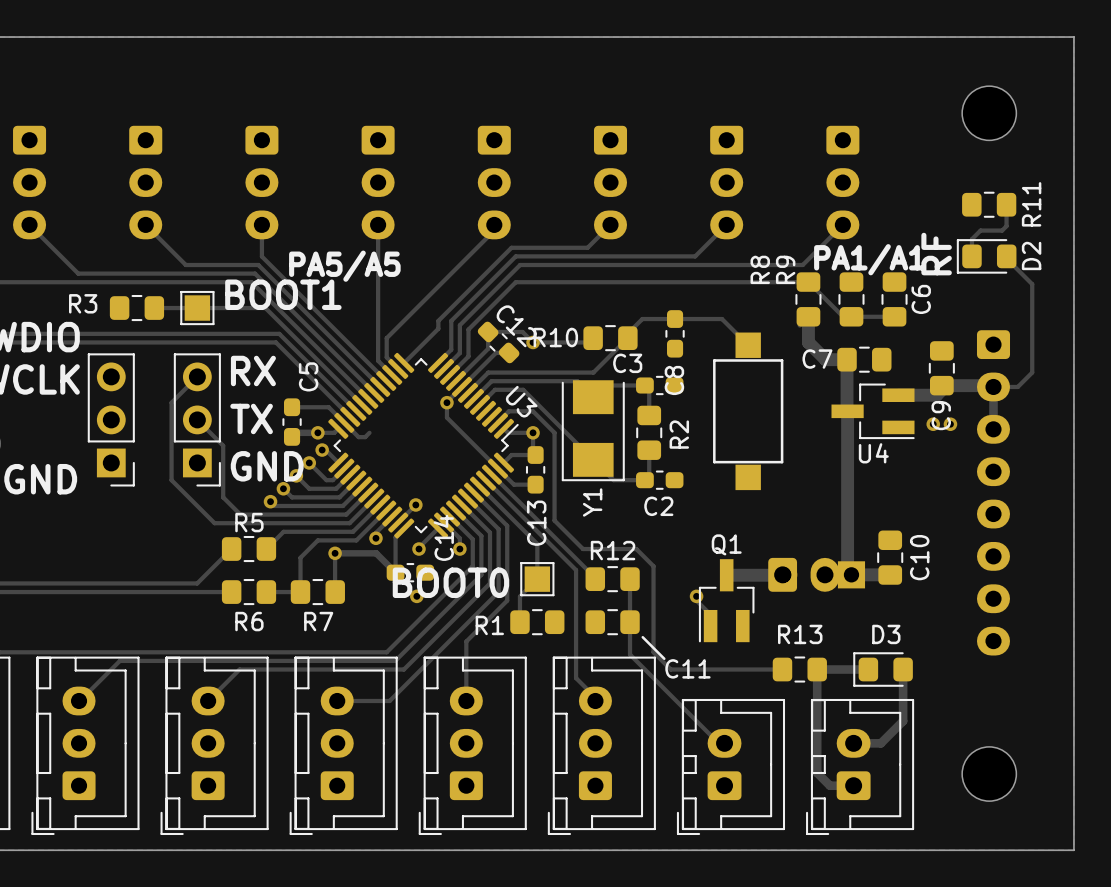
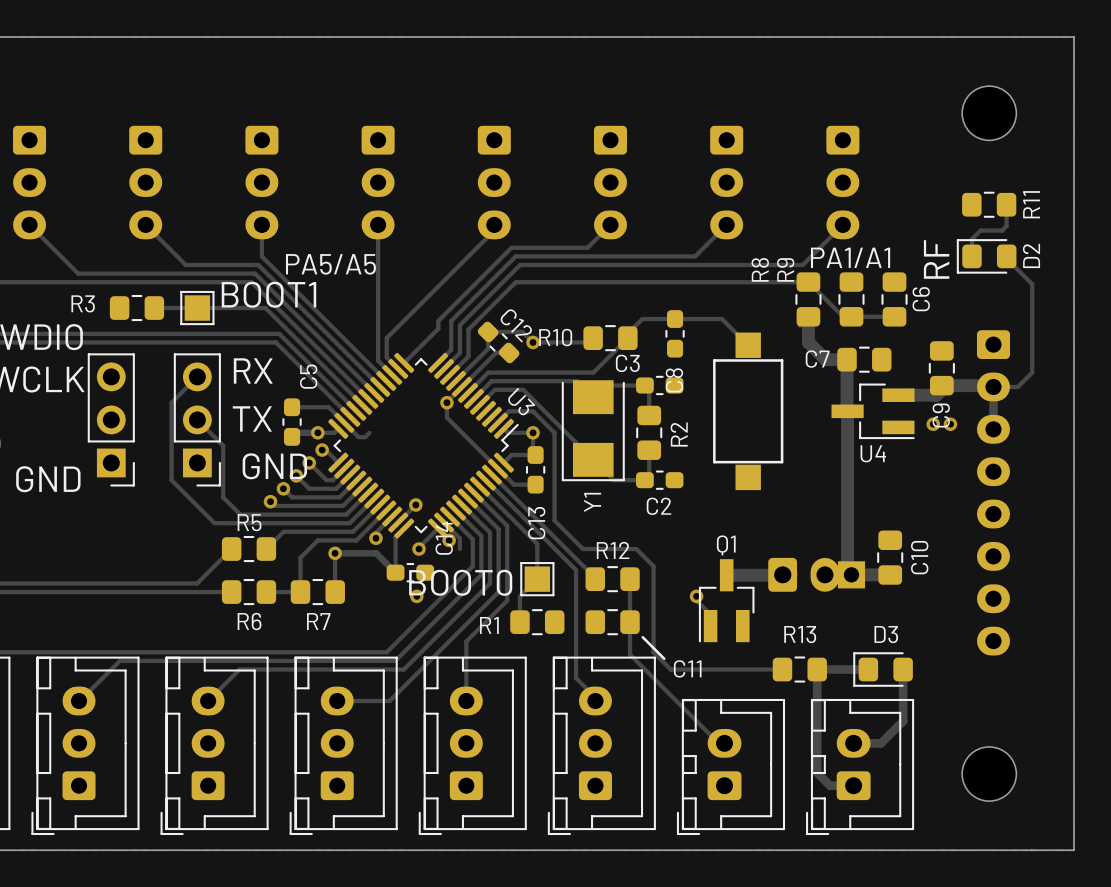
via position: (459, 549) -> (449, 540)

